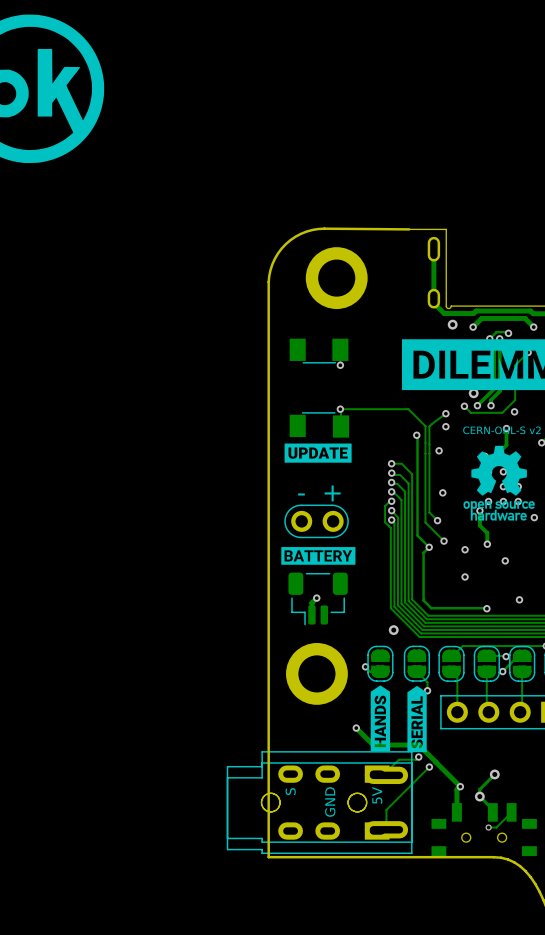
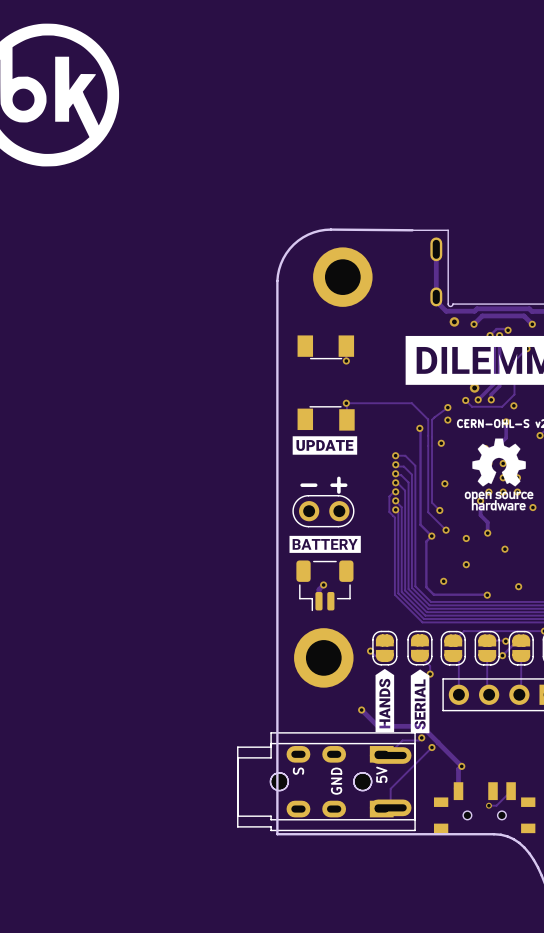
via: none -> (443, 581)
via: (393, 630) -> none
track: (494, 774) (479, 789) (479, 796) (492, 809) (492, 812) -> none
via: (494, 774) -> none
via: (479, 796) -> none

